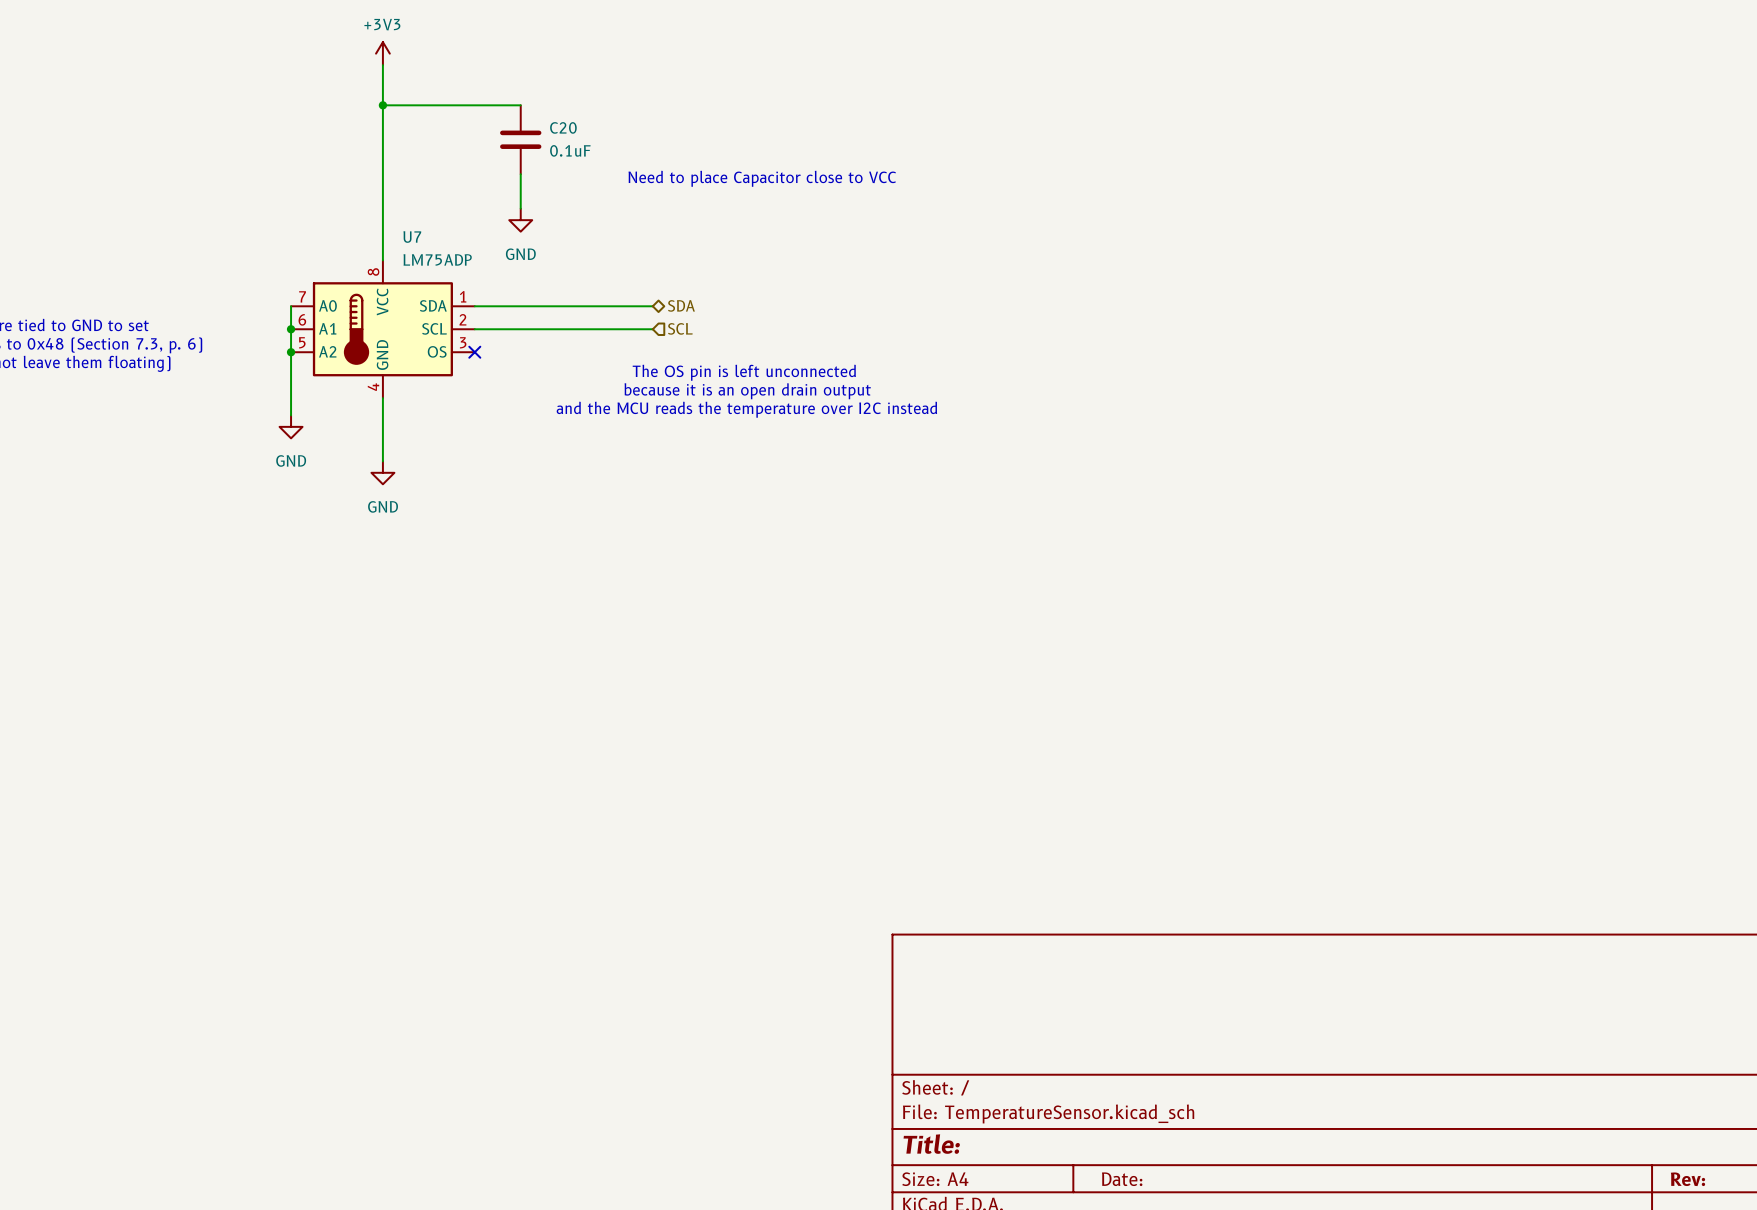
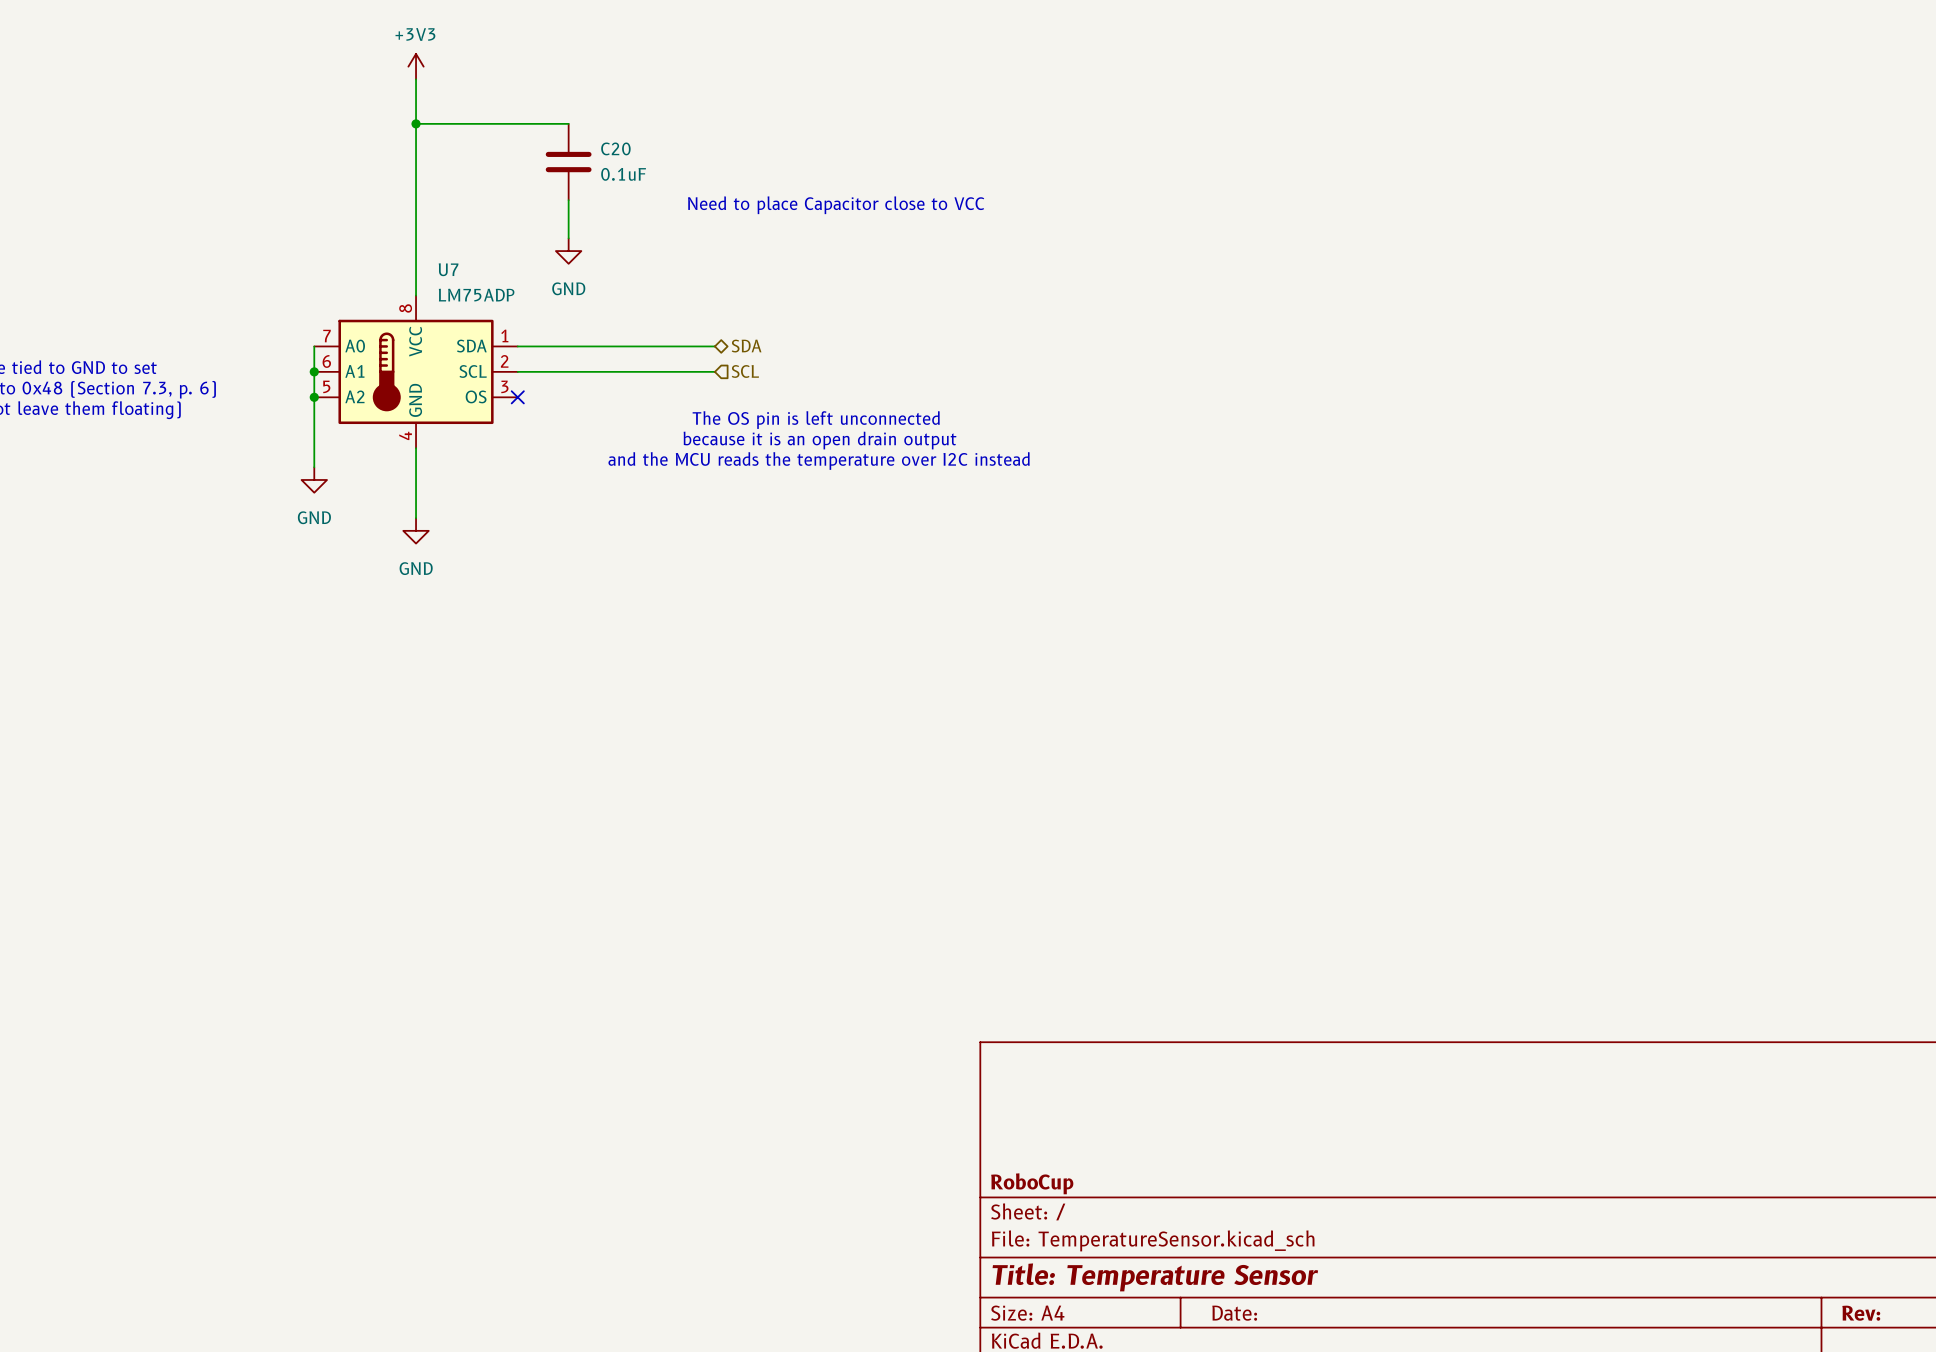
title block: none -> RoboCup (1032, 1183)
title block: Title: (931, 1144) -> Title: Temperature Sensor (1155, 1277)

